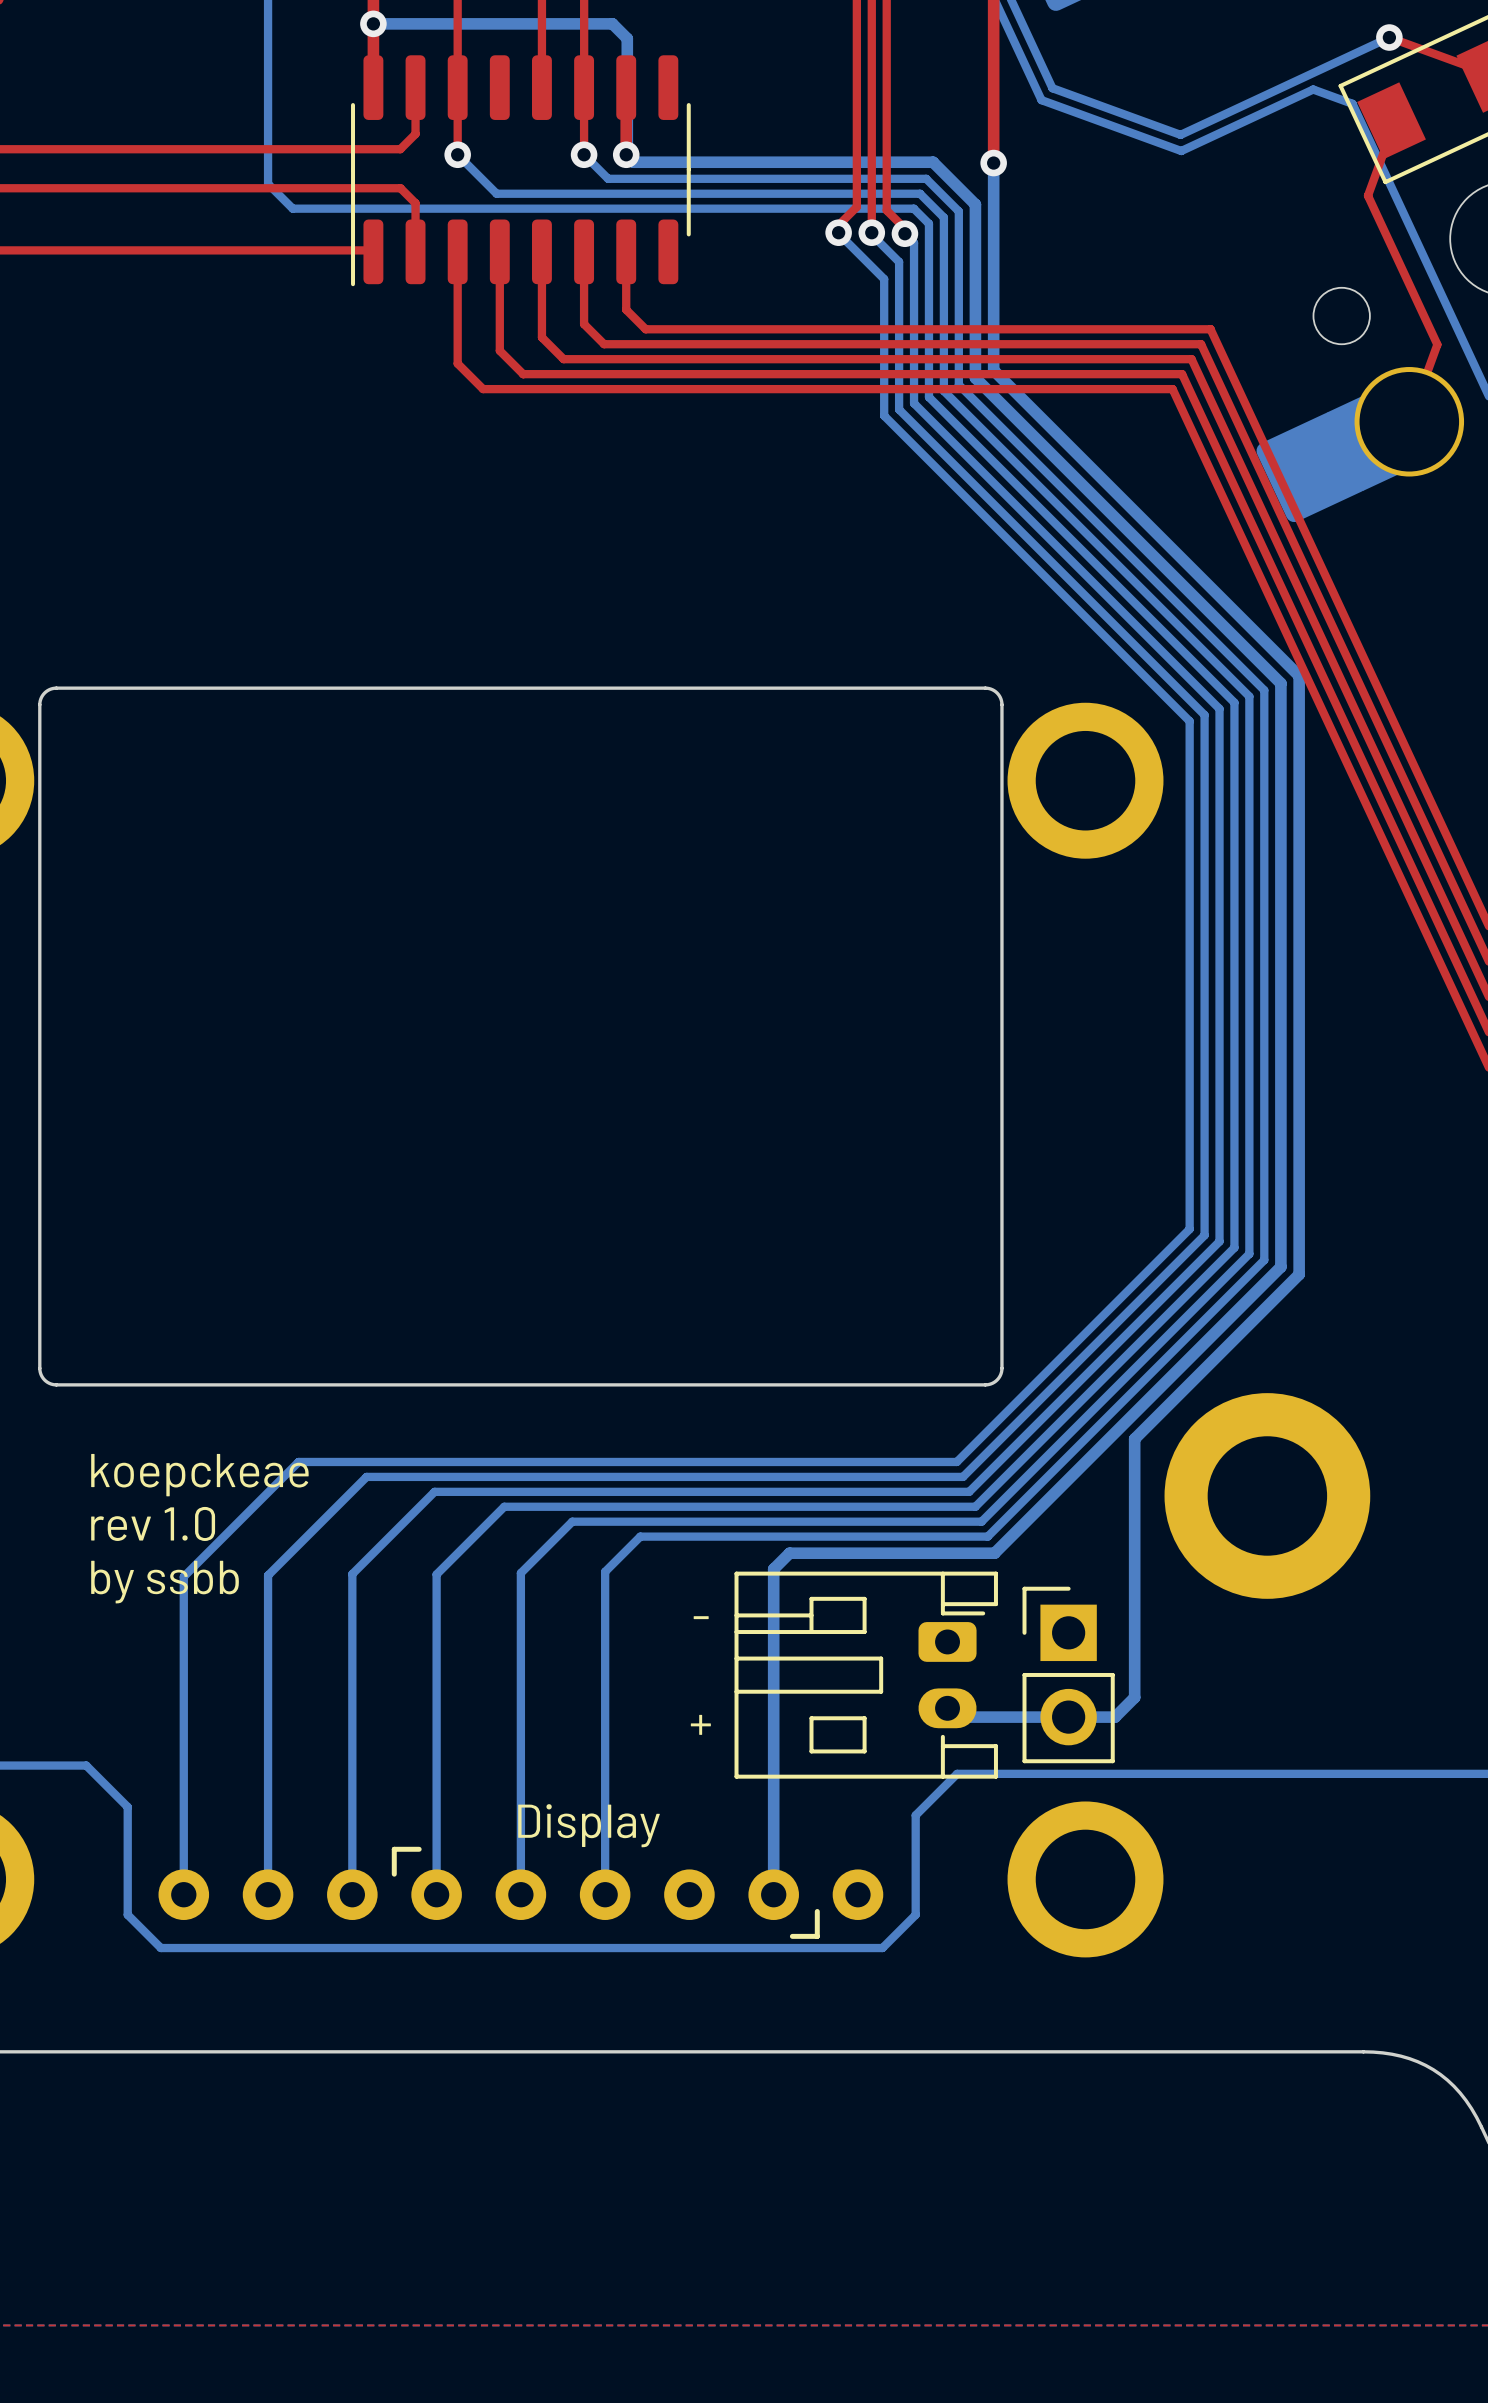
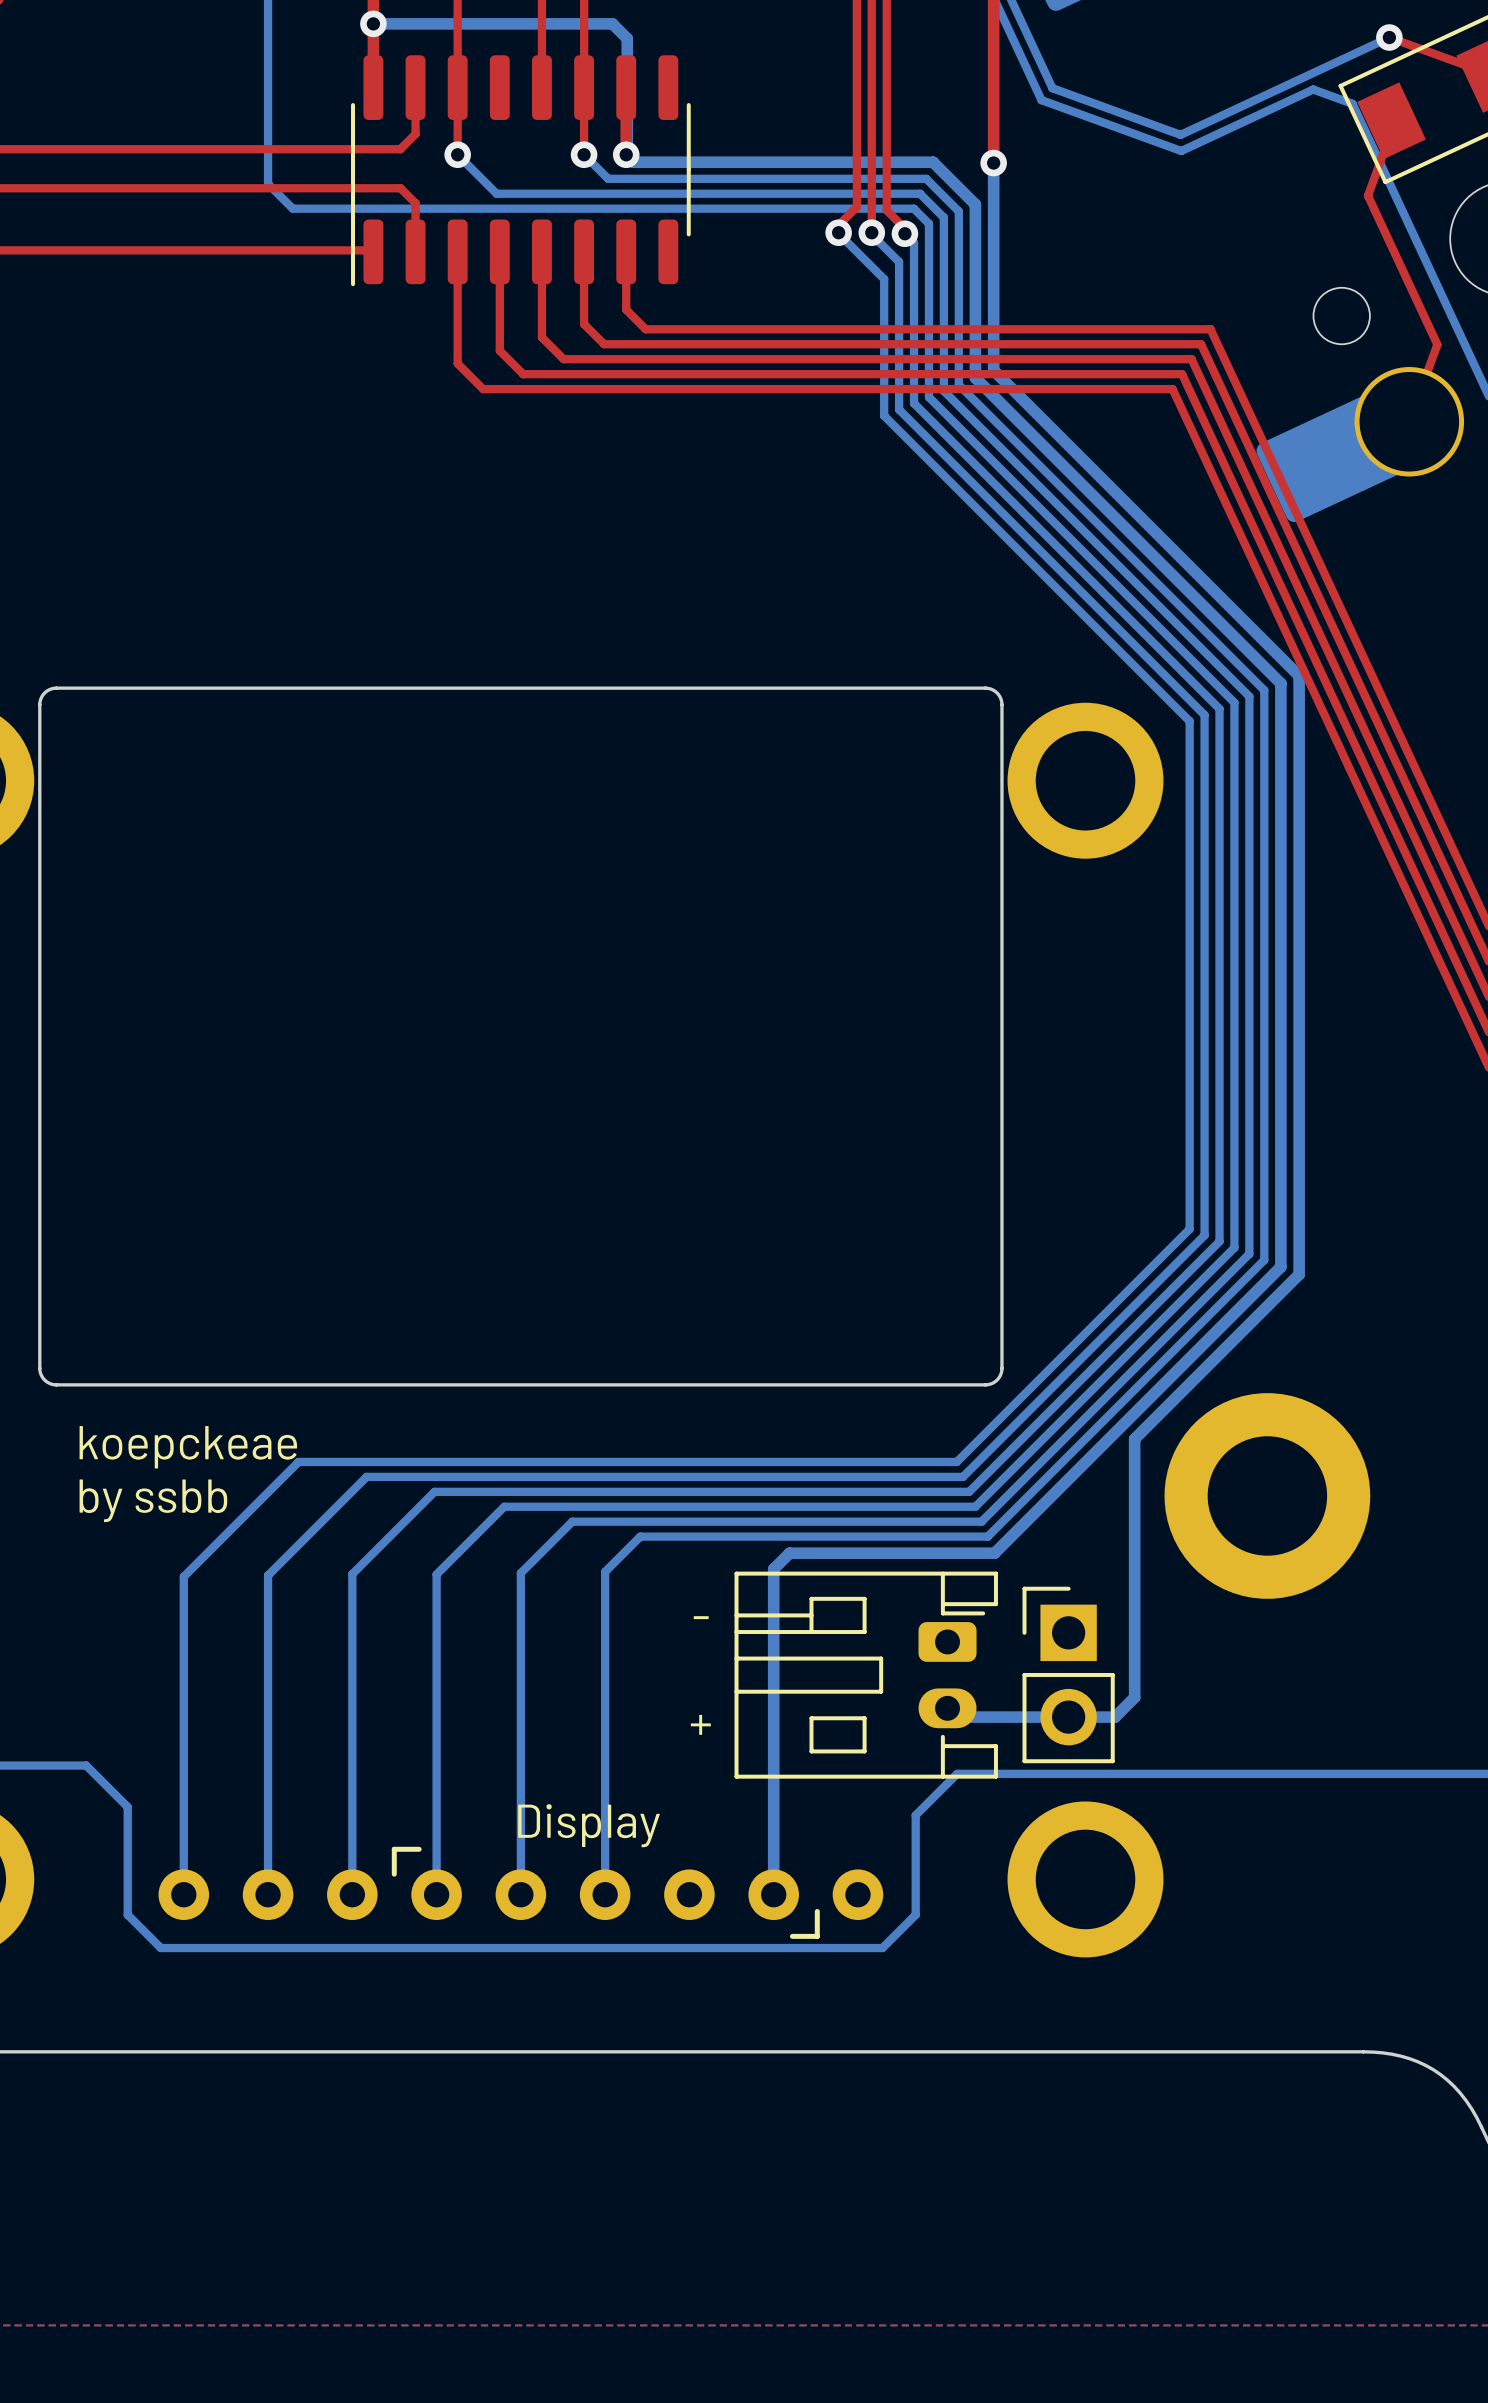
text position: koepckeae (199, 1475) -> koepckeae (188, 1447)
text: rev 1.0 (153, 1523) -> by ssbb (153, 1500)
text: by ssbb (165, 1582) -> none

